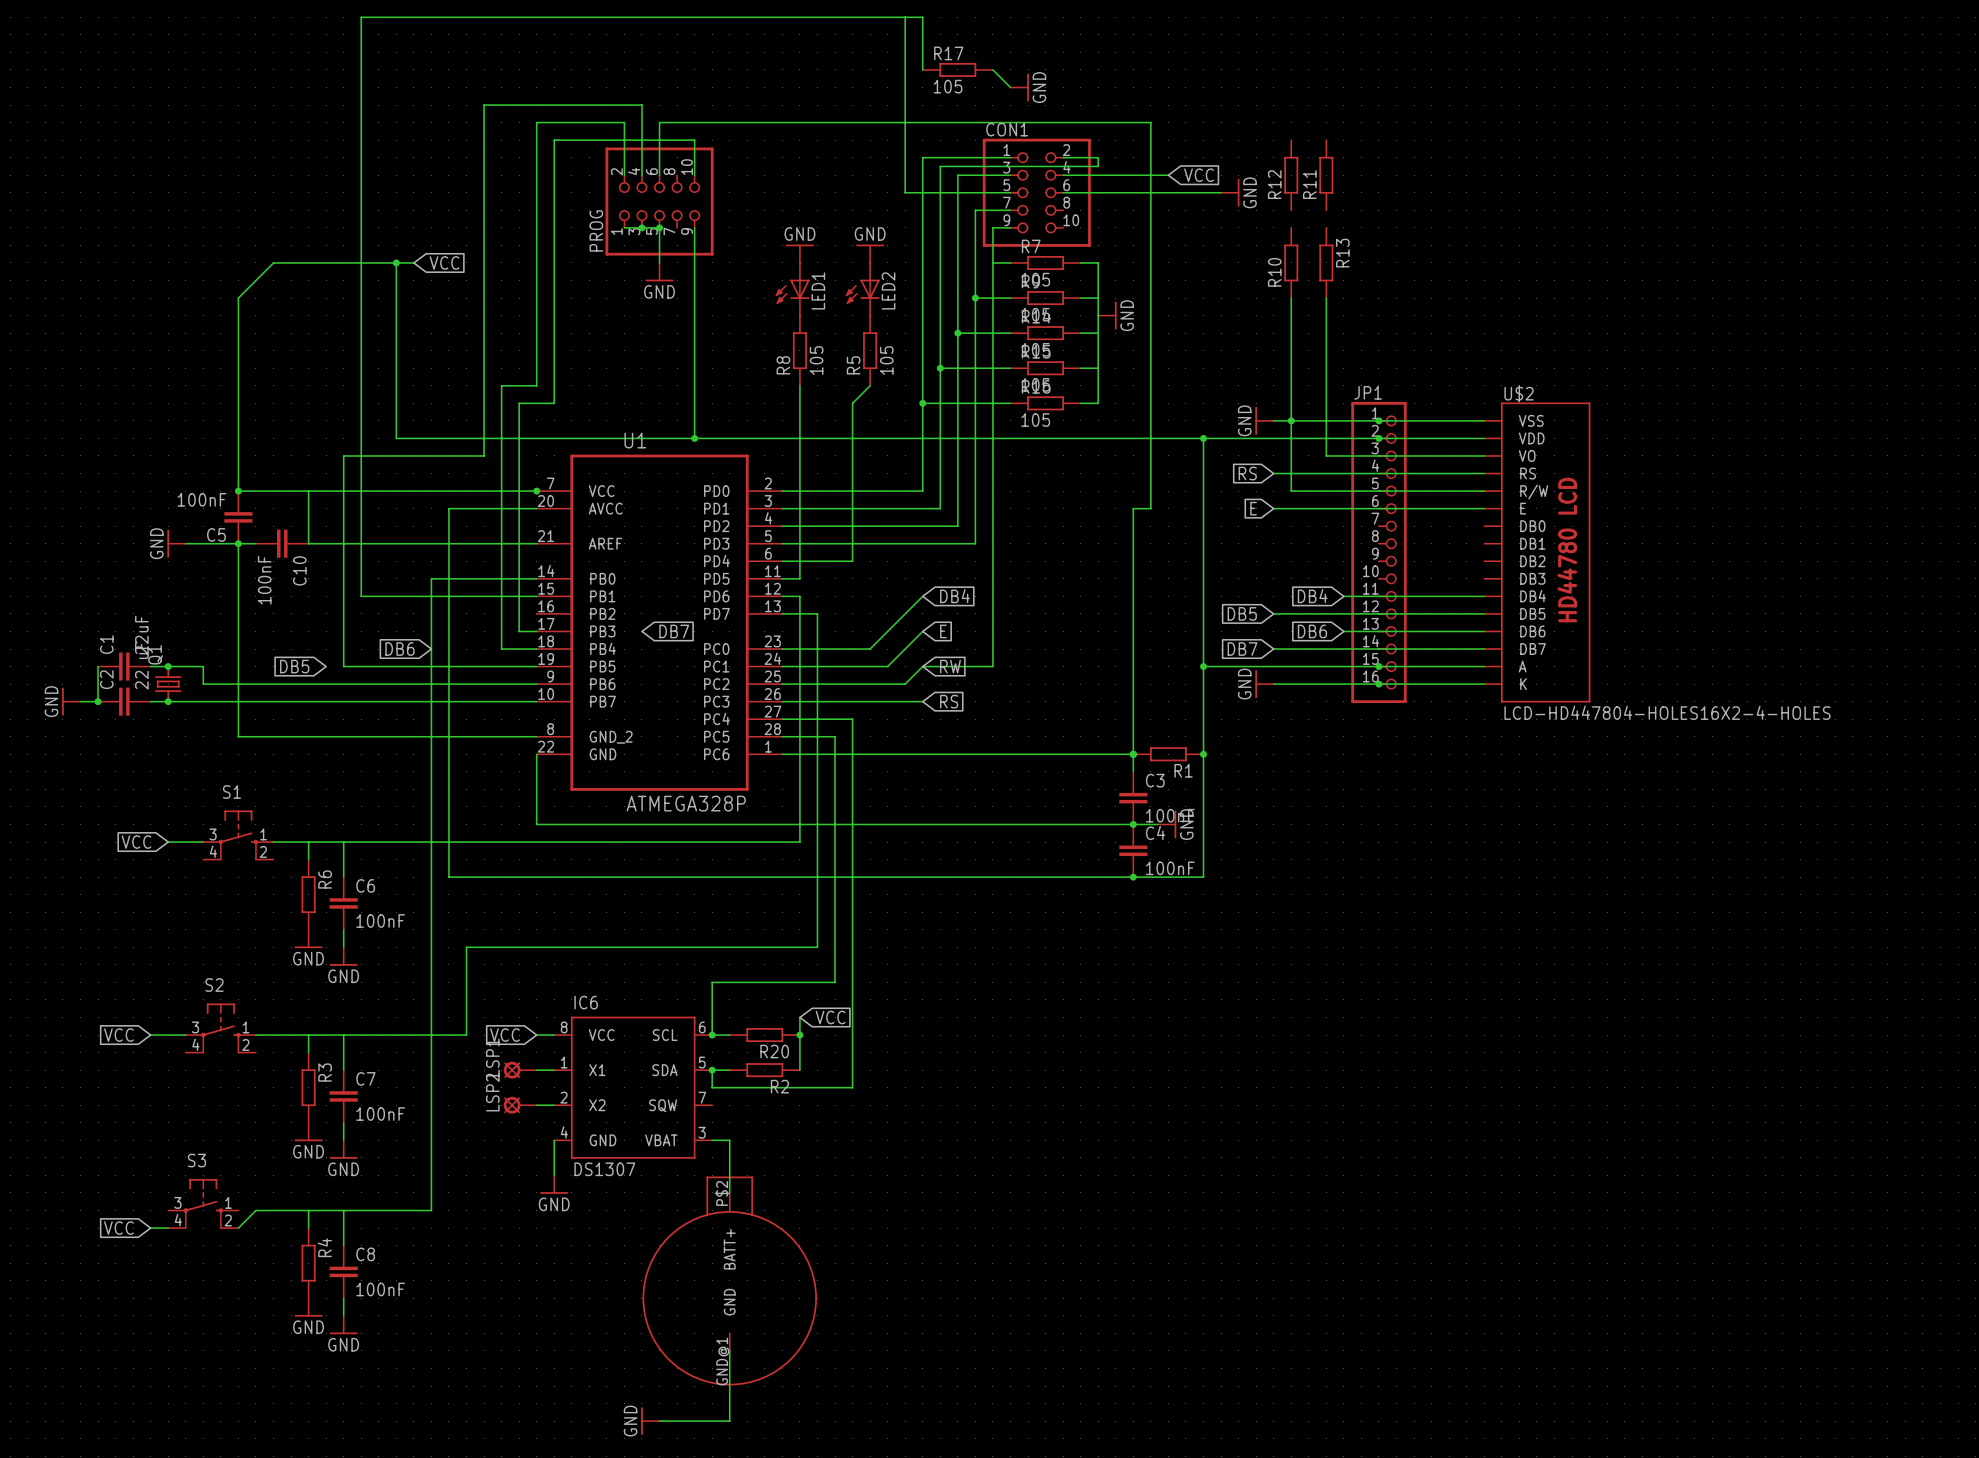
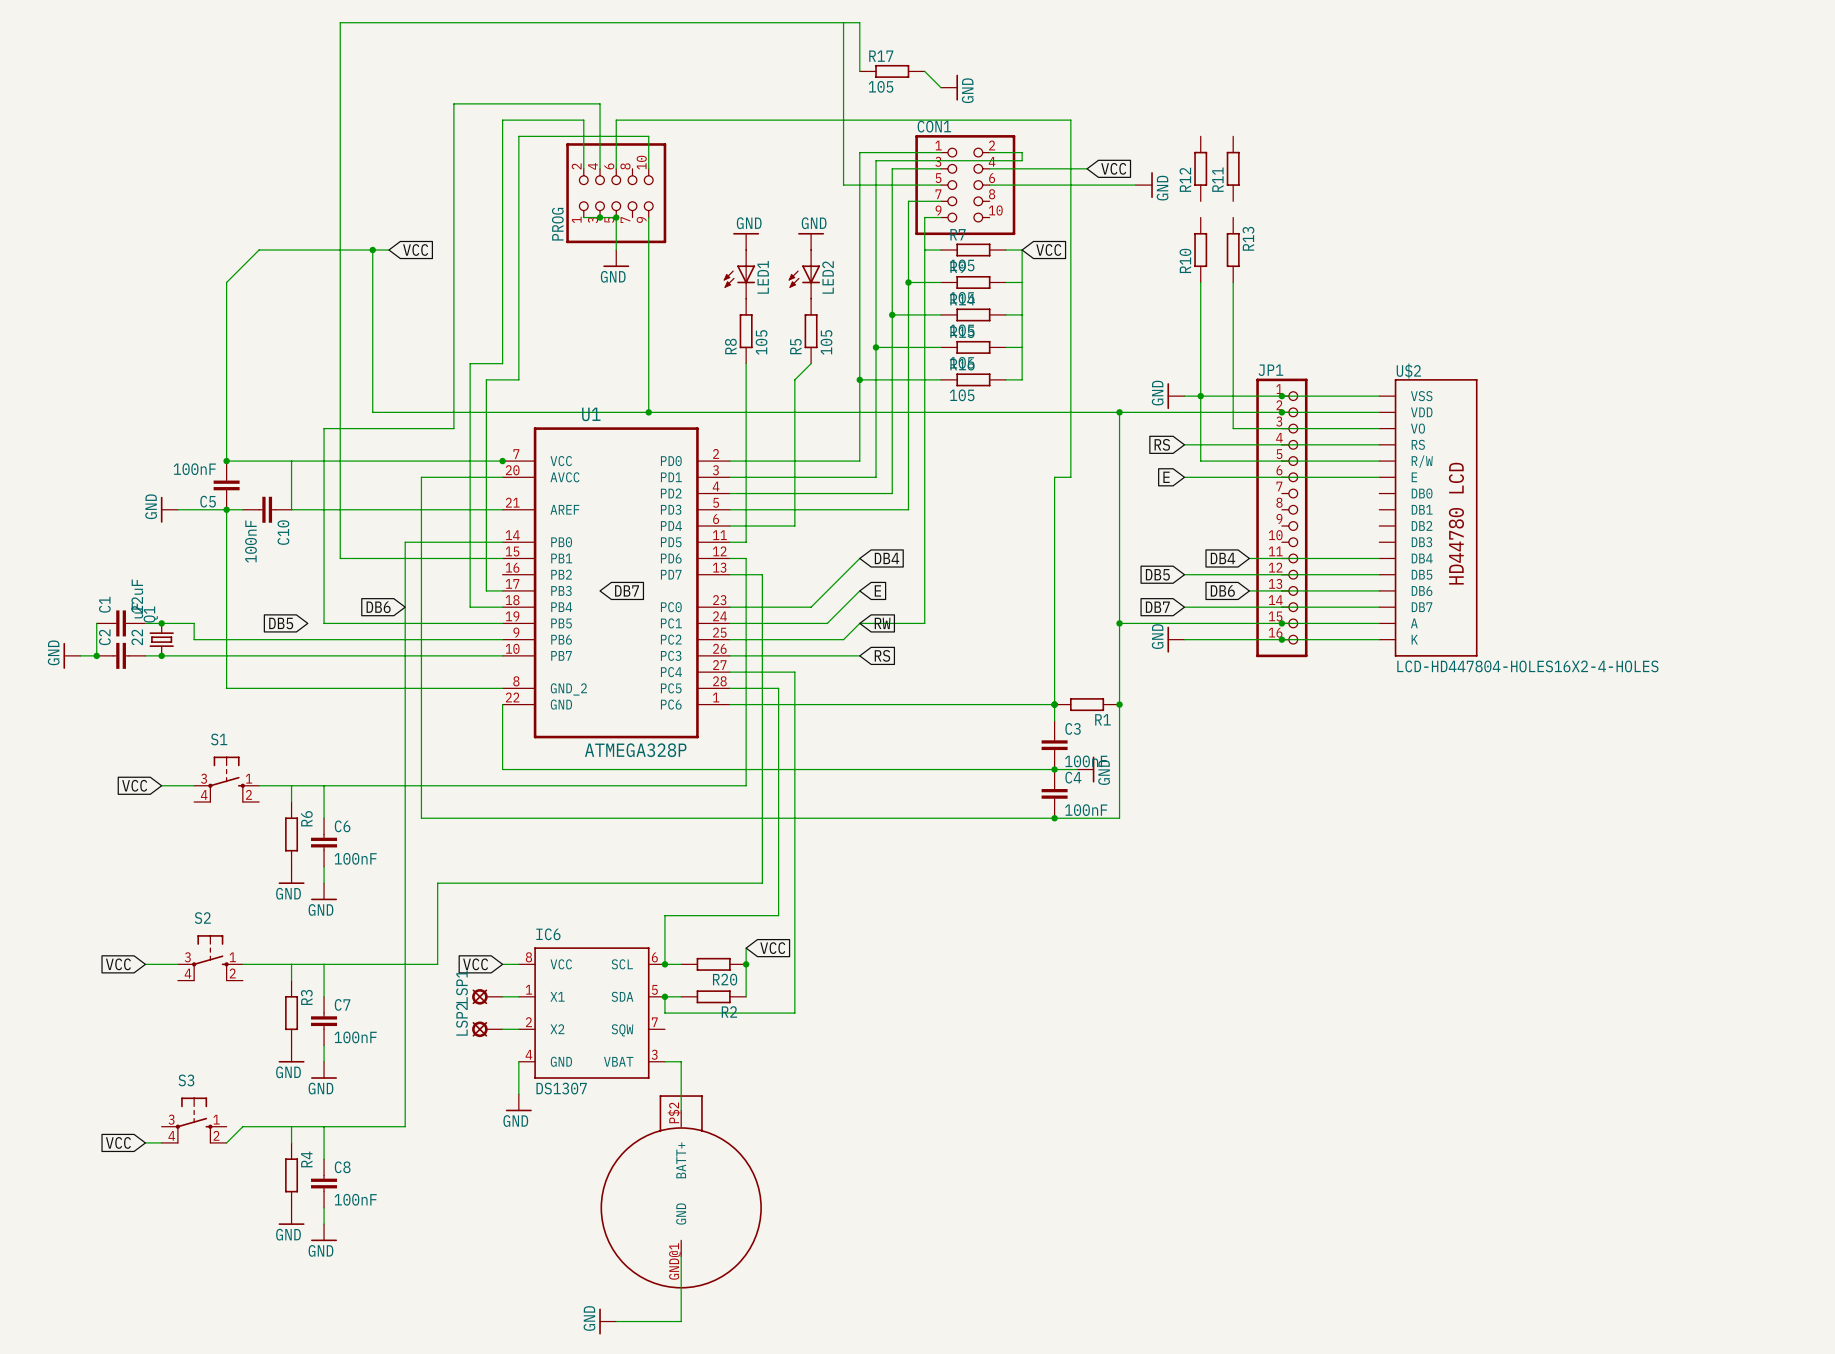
global label: none -> VCC (1048, 250)
power symbol: GND (1107, 315) -> none

